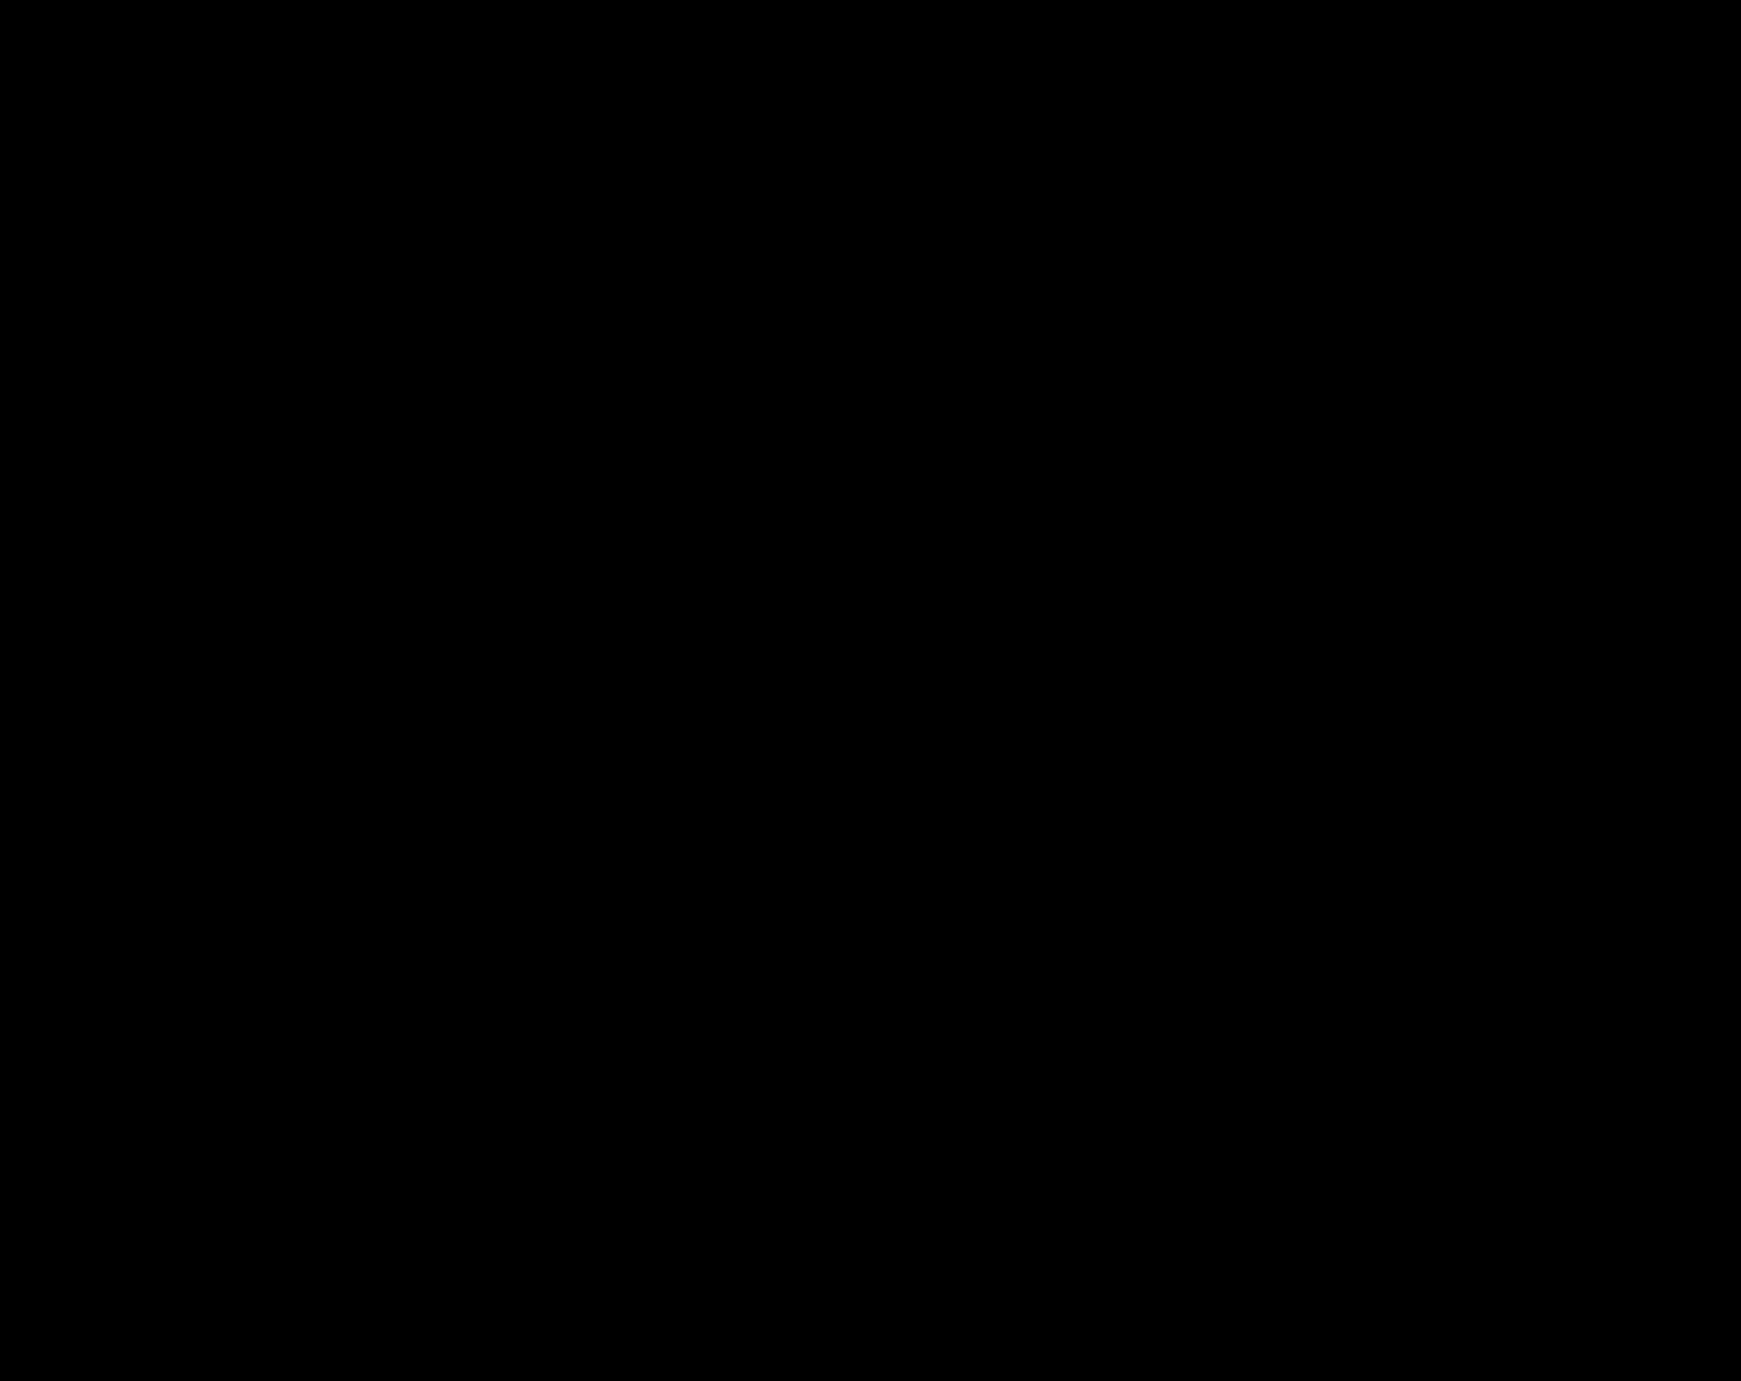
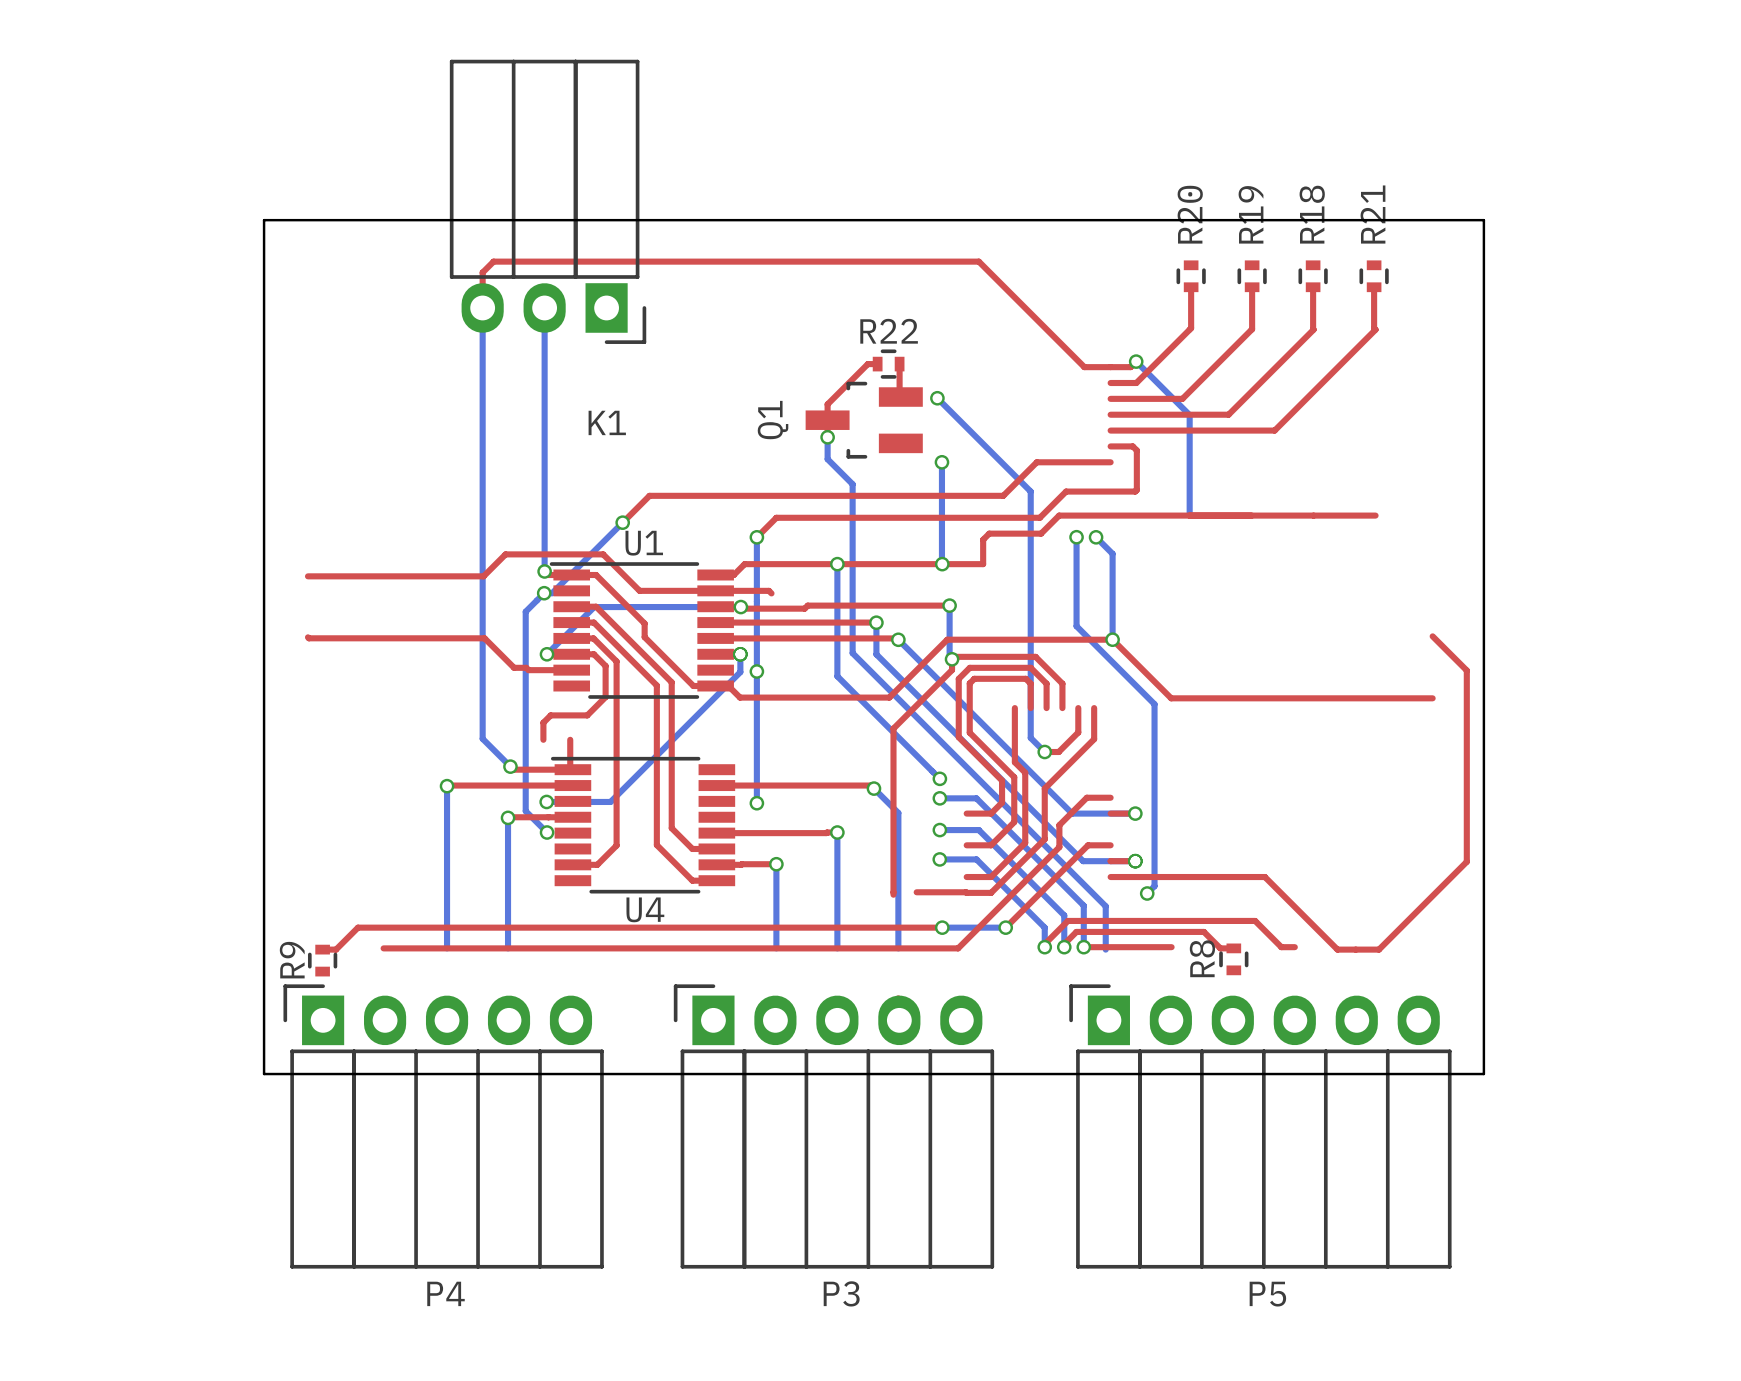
K1: none -> (548, 201)
board edge: none -> (264, 220) (264, 1074) (1483, 1074) (1483, 220) (264, 220)
R20: none -> (1191, 276)
R19: none -> (1252, 276)
R18: none -> (1313, 276)
R21: none -> (1374, 276)
top track: none -> (1191, 287) (1191, 328) (1136, 383) (1110, 383)
top track: none -> (1252, 287) (1252, 329) (1182, 398) (1110, 398)
top track: none -> (1313, 287) (1313, 329) (1228, 414) (1110, 414)
top track: none -> (1374, 287) (1375, 329) (1274, 430) (1110, 430)
bottom track: none -> (483, 305) (482, 738) (510, 766)
top track: none -> (482, 307) (482, 272) (493, 261) (978, 261) (1084, 367) (1130, 367) (1136, 361)
bottom track: none -> (547, 307) (544, 310) (544, 571)
bottom track: none -> (1136, 361) (1189, 415) (1189, 515)
via: none -> (1136, 361)
top track: none -> (877, 364) (867, 364) (827, 404) (827, 437)
R22: none -> (888, 364)
top track: none -> (899, 364) (899, 395) (902, 398)
bottom track: none -> (937, 398) (1030, 491) (1030, 737) (1044, 751)
via: none -> (937, 398)
Q1: none -> (864, 420)
bottom track: none -> (827, 437) (827, 459) (852, 484) (852, 653) (1105, 906) (1105, 949)
via: none -> (827, 437)
top track: none -> (1110, 446) (1132, 446) (1136, 450) (1136, 489) (1135, 491) (1066, 491) (1039, 517) (776, 517) (756, 537)
bottom track: none -> (941, 462) (941, 563)
via: none -> (941, 462)
top track: none -> (1110, 462) (1036, 462) (1003, 495) (649, 495) (622, 522)
top track: none -> (1375, 515) (1059, 515) (1041, 533) (989, 533) (983, 539) (983, 564) (744, 564) (733, 575) (715, 575) (717, 573)
bottom track: none -> (622, 522) (552, 593) (544, 593) (525, 611) (525, 811) (547, 832)
via: none -> (622, 522)
bottom track: none -> (756, 537) (756, 803)
via: none -> (756, 537)
bottom track: none -> (1076, 537) (1076, 626) (1154, 704) (1154, 886) (1147, 893)
via: none -> (1076, 537)
bottom track: none -> (1096, 537) (1112, 553) (1112, 639)
via: none -> (1096, 537)
bottom track: none -> (837, 564) (837, 676) (939, 778)
via: none -> (837, 564)
via: none -> (942, 564)
top track: none -> (544, 571) (547, 575) (596, 575) (644, 623) (644, 637) (693, 686) (728, 686) (740, 697) (889, 697) (947, 639) (1112, 639) (1171, 698) (1432, 698)
via: none -> (544, 571)
top track: none -> (307, 576) (483, 576) (505, 554) (603, 554) (639, 590) (768, 590) (771, 593)
via: none -> (544, 593)
top track: none -> (949, 605) (807, 605) (804, 608) (715, 607)
bottom track: none -> (949, 605) (949, 656) (952, 659)
via: none -> (949, 605)
top track: none -> (571, 606) (596, 606) (671, 682) (671, 828) (692, 848) (716, 848)
bottom track: none -> (740, 607) (594, 607) (546, 654)
via: none -> (740, 607)
top track: none -> (571, 622) (593, 622) (656, 685) (656, 845) (692, 880) (716, 880)
top track: none -> (715, 622) (876, 622)
bottom track: none -> (876, 622) (876, 654) (1083, 861) (1135, 861)
via: none -> (876, 622)
U1: none -> (641, 630)
top track: none -> (1432, 636) (1466, 670) (1466, 861) (1378, 949) (1337, 949) (1264, 877) (1110, 877)
top track: none -> (307, 637) (484, 638) (514, 667) (526, 667) (528, 670) (571, 670)
top track: none -> (571, 638) (593, 638) (616, 661) (616, 845) (597, 864) (572, 864)
top track: none -> (715, 638) (898, 639)
bottom track: none -> (898, 639) (1072, 813) (1135, 813)
via: none -> (898, 639)
via: none -> (1112, 639)
top track: none -> (546, 654) (593, 654) (605, 666) (605, 697) (587, 715) (550, 715) (543, 722) (543, 739)
via: none -> (546, 654)
bottom track: none -> (740, 654) (740, 672) (610, 801) (546, 801)
via: none -> (740, 654)
via: none -> (952, 659)
via: none -> (756, 671)
top track: none -> (1014, 708) (1014, 762) (1025, 772) (1025, 842) (991, 877) (966, 877)
top track: none -> (1030, 708) (1030, 683) (1025, 678) (974, 678) (969, 683) (969, 732) (1014, 777) (1014, 822) (991, 845) (966, 845)
top track: none -> (1046, 708) (1046, 683) (1030, 667) (969, 667) (958, 678) (958, 737) (1002, 780) (1002, 802) (991, 813) (966, 813)
top track: none -> (1062, 708) (1062, 683) (1035, 656) (952, 656) (952, 670) (893, 728) (893, 894)
top track: none -> (1078, 708) (1078, 732) (1058, 751) (1044, 751)
top track: none -> (1094, 708) (1094, 739) (1044, 788) (1044, 839) (991, 892) (916, 892)
top track: none -> (570, 739) (570, 767) (572, 769) (513, 769) (510, 766)
via: none -> (1044, 751)
via: none -> (510, 766)
via: none -> (939, 778)
top track: none -> (572, 785) (447, 786)
top track: none -> (716, 785) (870, 785) (873, 788)
bottom track: none -> (447, 786) (447, 948)
via: none -> (447, 786)
bottom track: none -> (873, 788) (898, 812) (898, 948)
via: none -> (873, 788)
top track: none -> (1110, 797) (1086, 797) (1059, 825) (1059, 847) (958, 948) (383, 948)
bottom track: none -> (939, 798) (976, 798) (1083, 905) (1083, 947)
via: none -> (939, 798)
via: none -> (546, 801)
via: none -> (756, 803)
top track: none -> (1110, 813) (1135, 813)
via: none -> (1135, 813)
bottom track: none -> (508, 817) (508, 948)
via: none -> (508, 817)
top track: none -> (572, 817) (508, 817)
U4: none -> (643, 825)
bottom track: none -> (939, 830) (978, 830) (1064, 915) (1064, 947)
via: none -> (939, 830)
via: none -> (547, 832)
top track: none -> (837, 832) (716, 833)
bottom track: none -> (837, 832) (837, 948)
via: none -> (837, 832)
top track: none -> (1110, 845) (1088, 845) (1005, 927)
bottom track: none -> (939, 859) (976, 859) (1044, 927) (1044, 947)
via: none -> (939, 859)
top track: none -> (1110, 861) (1135, 861)
via: none -> (1135, 861)
top track: none -> (776, 864) (716, 864)
bottom track: none -> (776, 864) (776, 948)
via: none -> (776, 864)
via: none -> (1147, 893)
top track: none -> (942, 927) (357, 927) (336, 949) (322, 949)
bottom track: none -> (942, 927) (1005, 927)
via: none -> (942, 927)
via: none -> (1005, 927)
top track: none -> (1044, 947) (1044, 944) (1067, 920) (1255, 920) (1281, 947) (1294, 947)
via: none -> (1044, 947)
top track: none -> (1064, 947) (1064, 944) (1076, 931) (1203, 931) (1220, 948) (1233, 948)
via: none -> (1064, 947)
top track: none -> (1083, 947) (1171, 947)
via: none -> (1083, 947)
R8: none -> (1233, 959)
R9: none -> (322, 960)
top track: none -> (898, 998) (898, 1002)
P4: none -> (443, 1126)
P3: none -> (833, 1126)
P5: none -> (1260, 1126)

